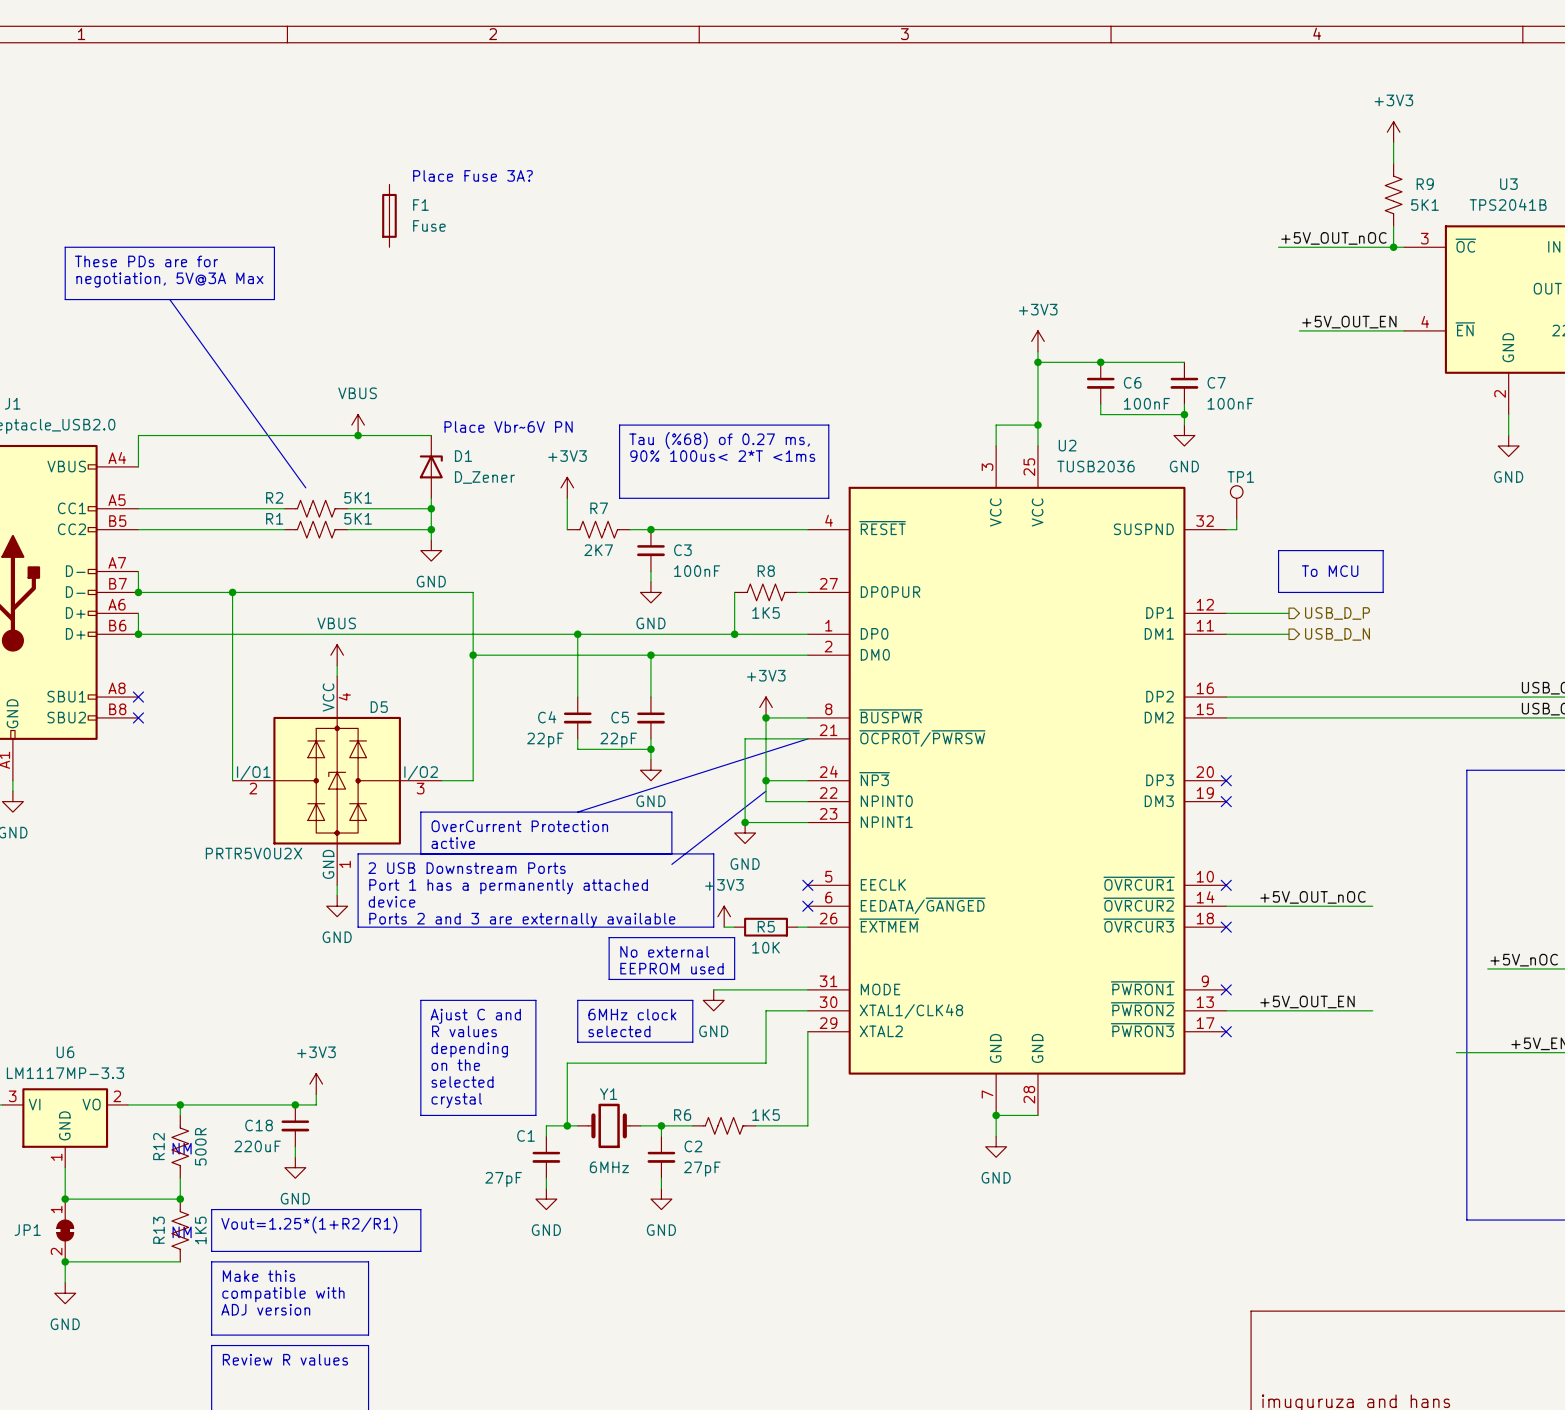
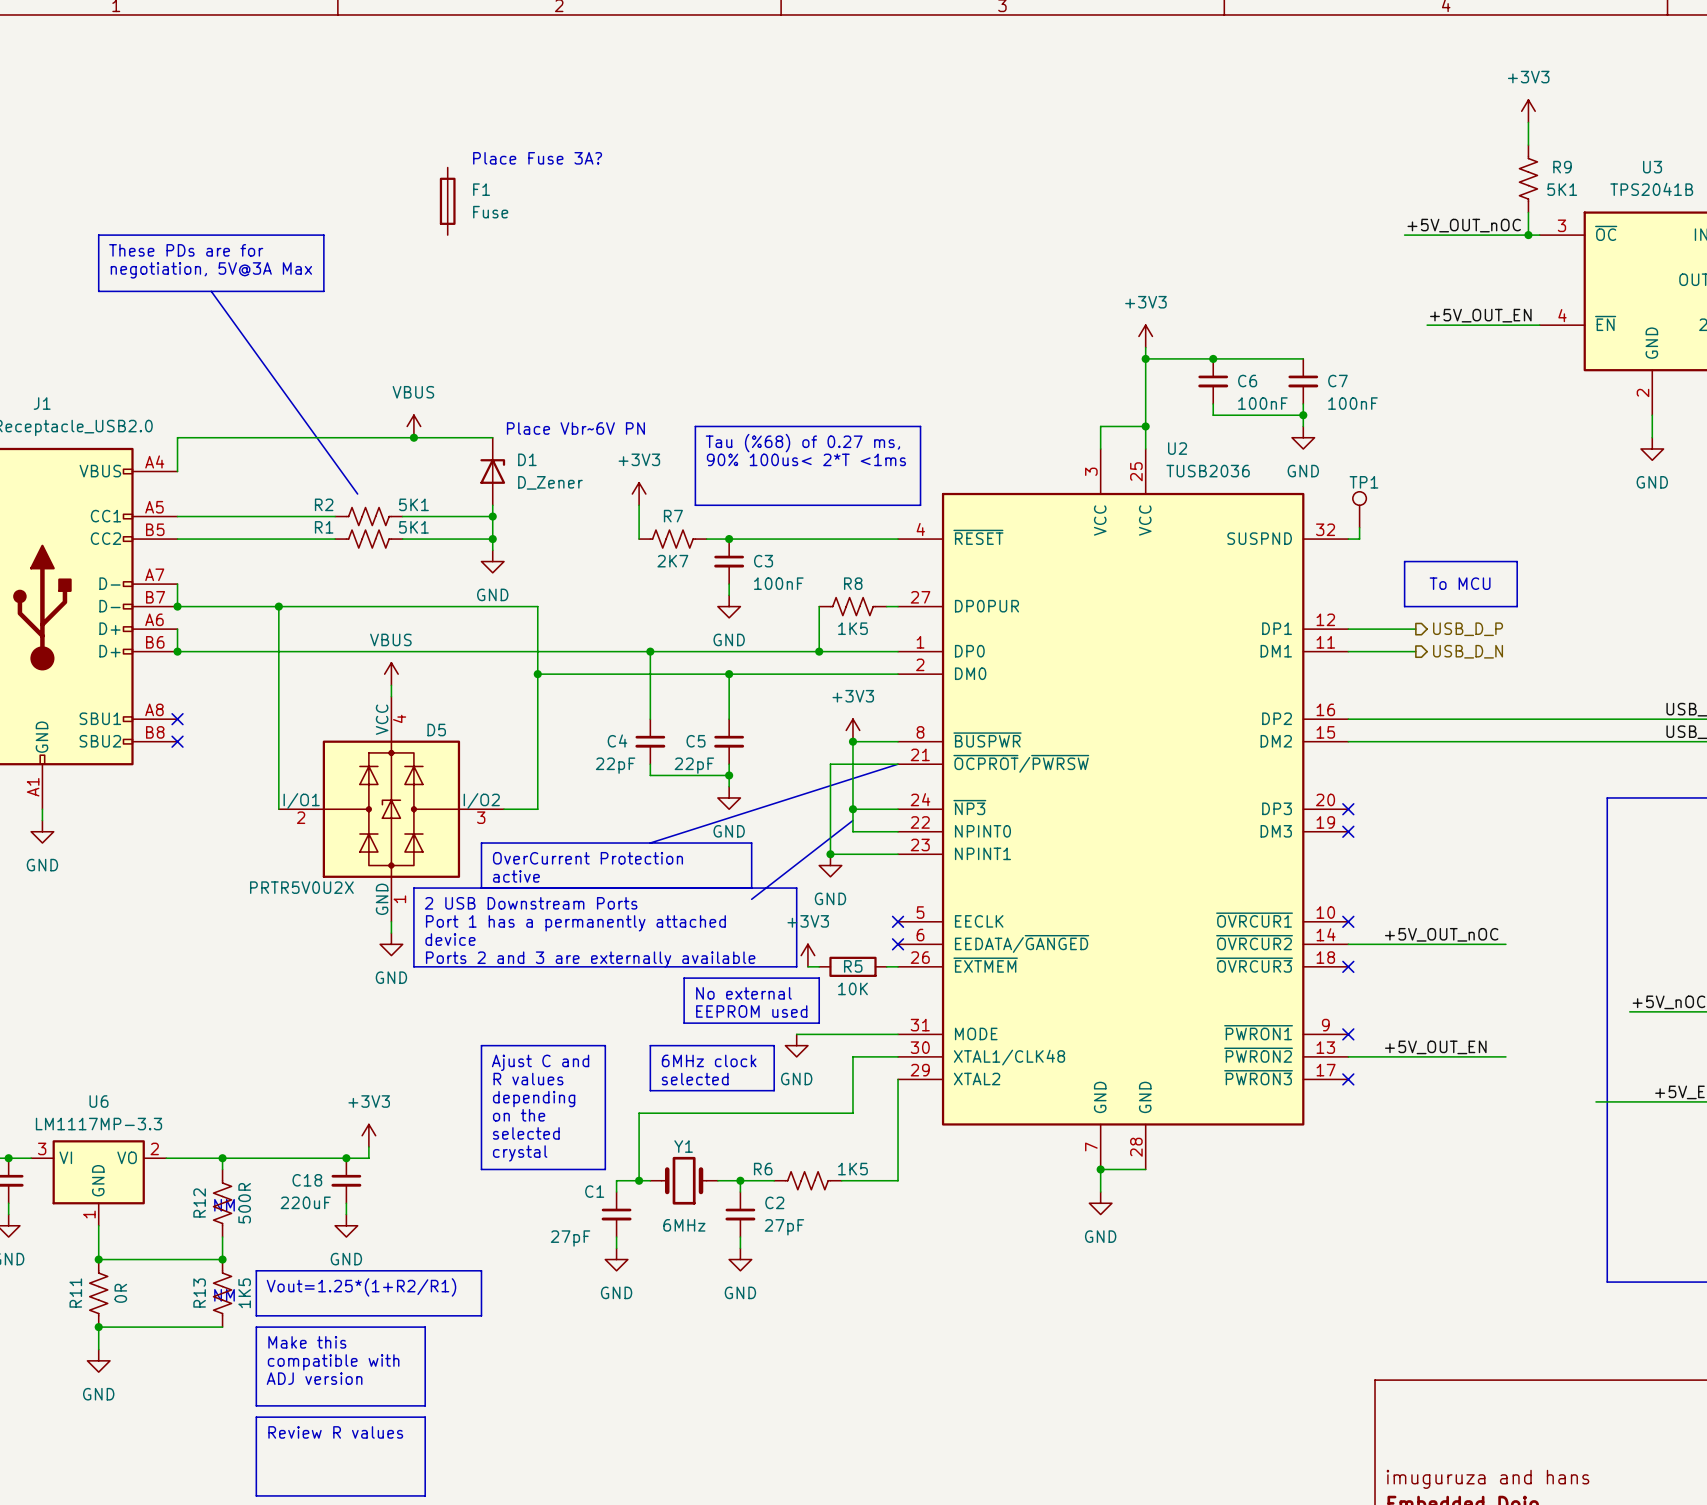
JP1: (65, 1230) -> none
R11: none -> 0R (98, 1293)

